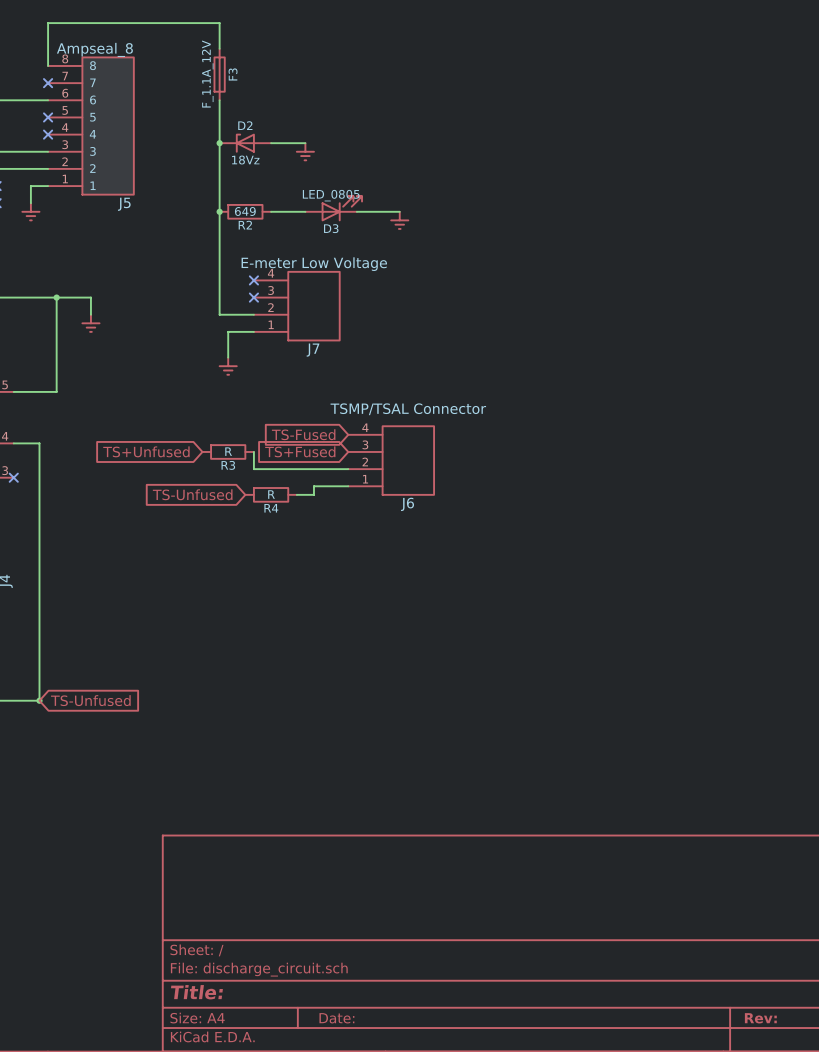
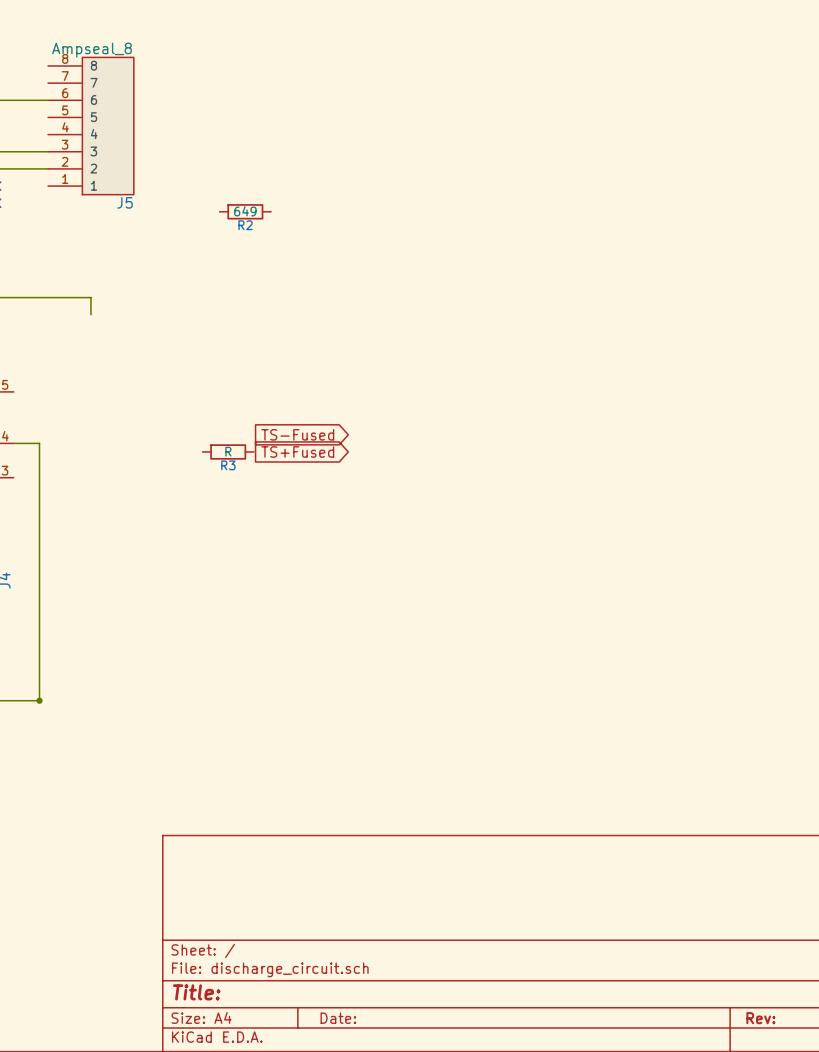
wire: (219, 48) (219, 23) (48, 23) (48, 65) -> none
F3: F_1.1A_12V (219, 74) -> none
no-connect mark: (48, 83) -> none
wire: (219, 100) (219, 314) (253, 314) -> none
no-connect mark: (48, 117) -> none
no-connect mark: (48, 134) -> none
junction: (219, 143) -> none
D2: 18Vz (245, 143) -> none
wire: (271, 143) (305, 143) -> none
power symbol: (305, 151) -> none
wire: (48, 186) (30, 186) (30, 203) -> none
D3: LED_0805 (333, 208) -> none
power symbol: (30, 211) -> none
junction: (219, 211) -> none
wire: (271, 211) (305, 211) -> none
wire: (356, 211) (399, 211) -> none
power symbol: (399, 220) -> none
no-connect mark: (253, 280) -> none
wire: (56, 297) (56, 391) (13, 391) -> none
junction: (56, 297) -> none
no-connect mark: (253, 297) -> none
J7: E-meter Low Voltage (296, 306) -> none
power symbol: (90, 323) -> none
wire: (253, 331) (228, 331) (228, 357) -> none
power symbol: (228, 366) -> none
global label: TS+Unfused (146, 451) -> none
wire: (253, 451) (253, 469) (348, 469) -> none
J6: TSMP/TSAL Connector (391, 460) -> none
no-connect mark: (13, 477) -> none
wire: (348, 486) (313, 486) (313, 494) (296, 494) -> none
global label: TS-Unfused (192, 494) -> none
R4: R (271, 494) -> none
global label: TS-Unfused (90, 700) -> none

